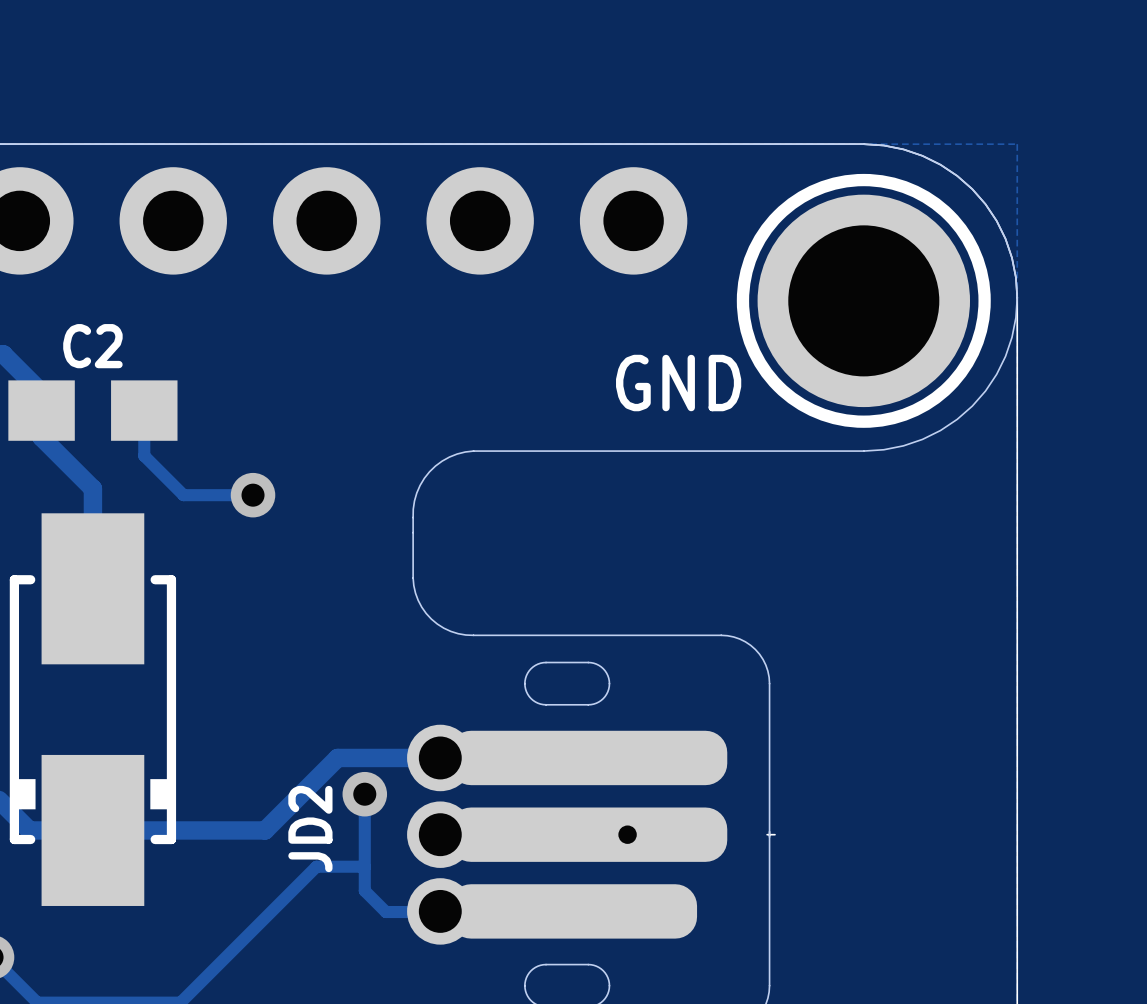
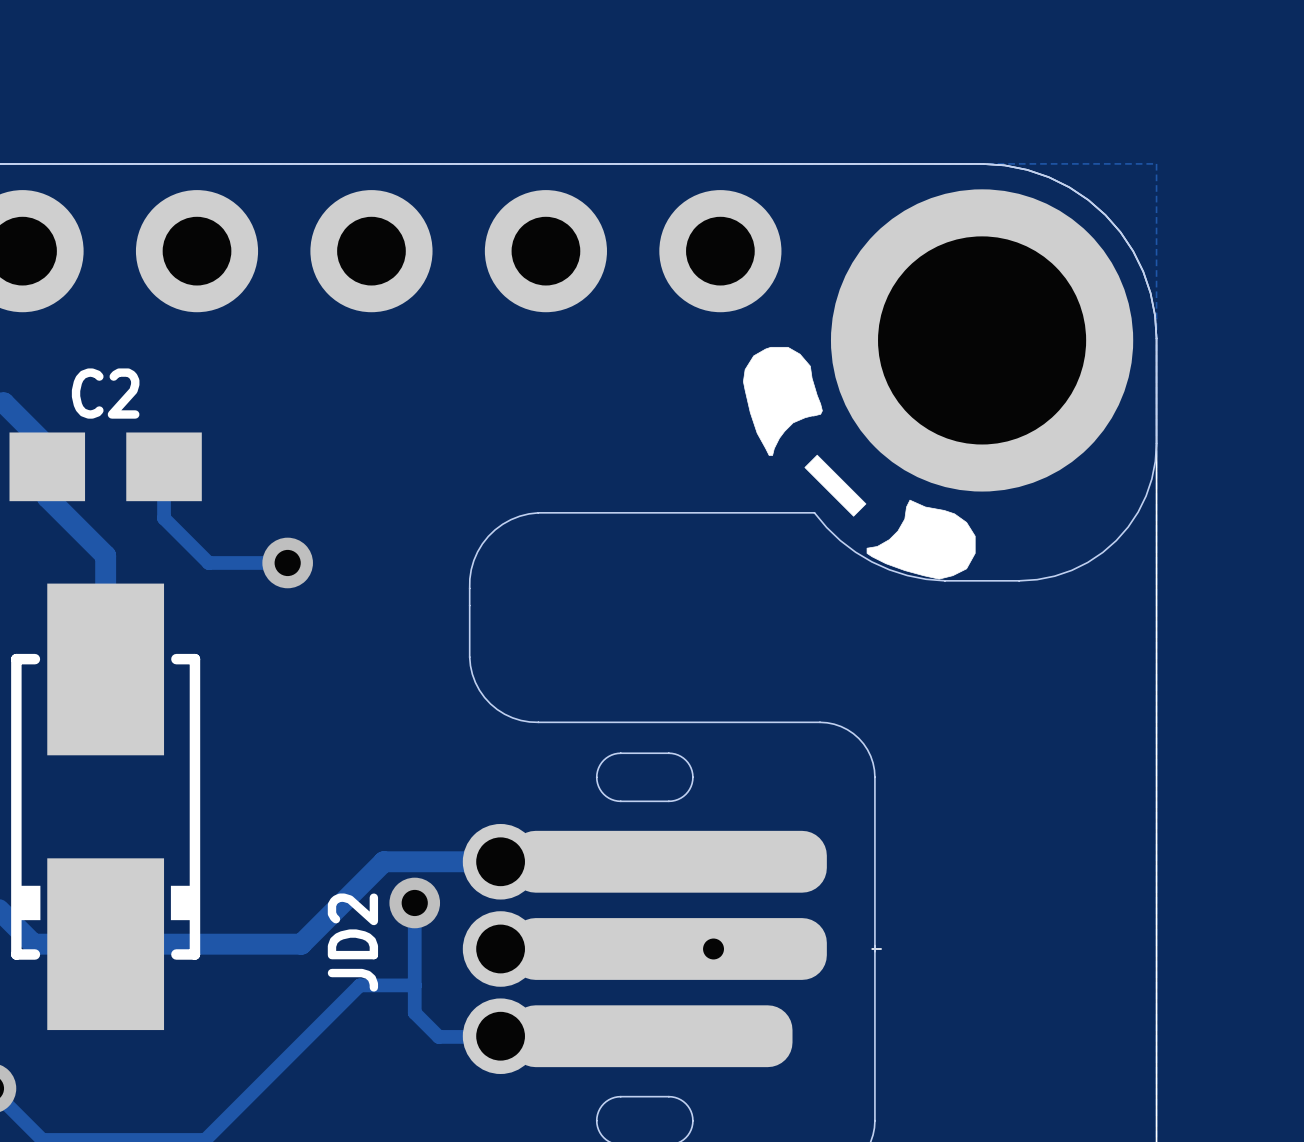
part footprint: [736, 173, 991, 428] -> [743, 189, 1134, 580]
board edge: (1017, 297) (1012, 337) (996, 374) (972, 406) (940, 430) (903, 445) (883, 449) (716, 451) -> (1156, 338) (1156, 443) (1151, 479) (1138, 512) (1128, 527) (1116, 540) (1087, 562) (1071, 570) (1037, 579) (944, 580) (926, 579) (889, 569) (855, 552) (840, 540) (814, 512)
text: GND (678, 383) -> none

